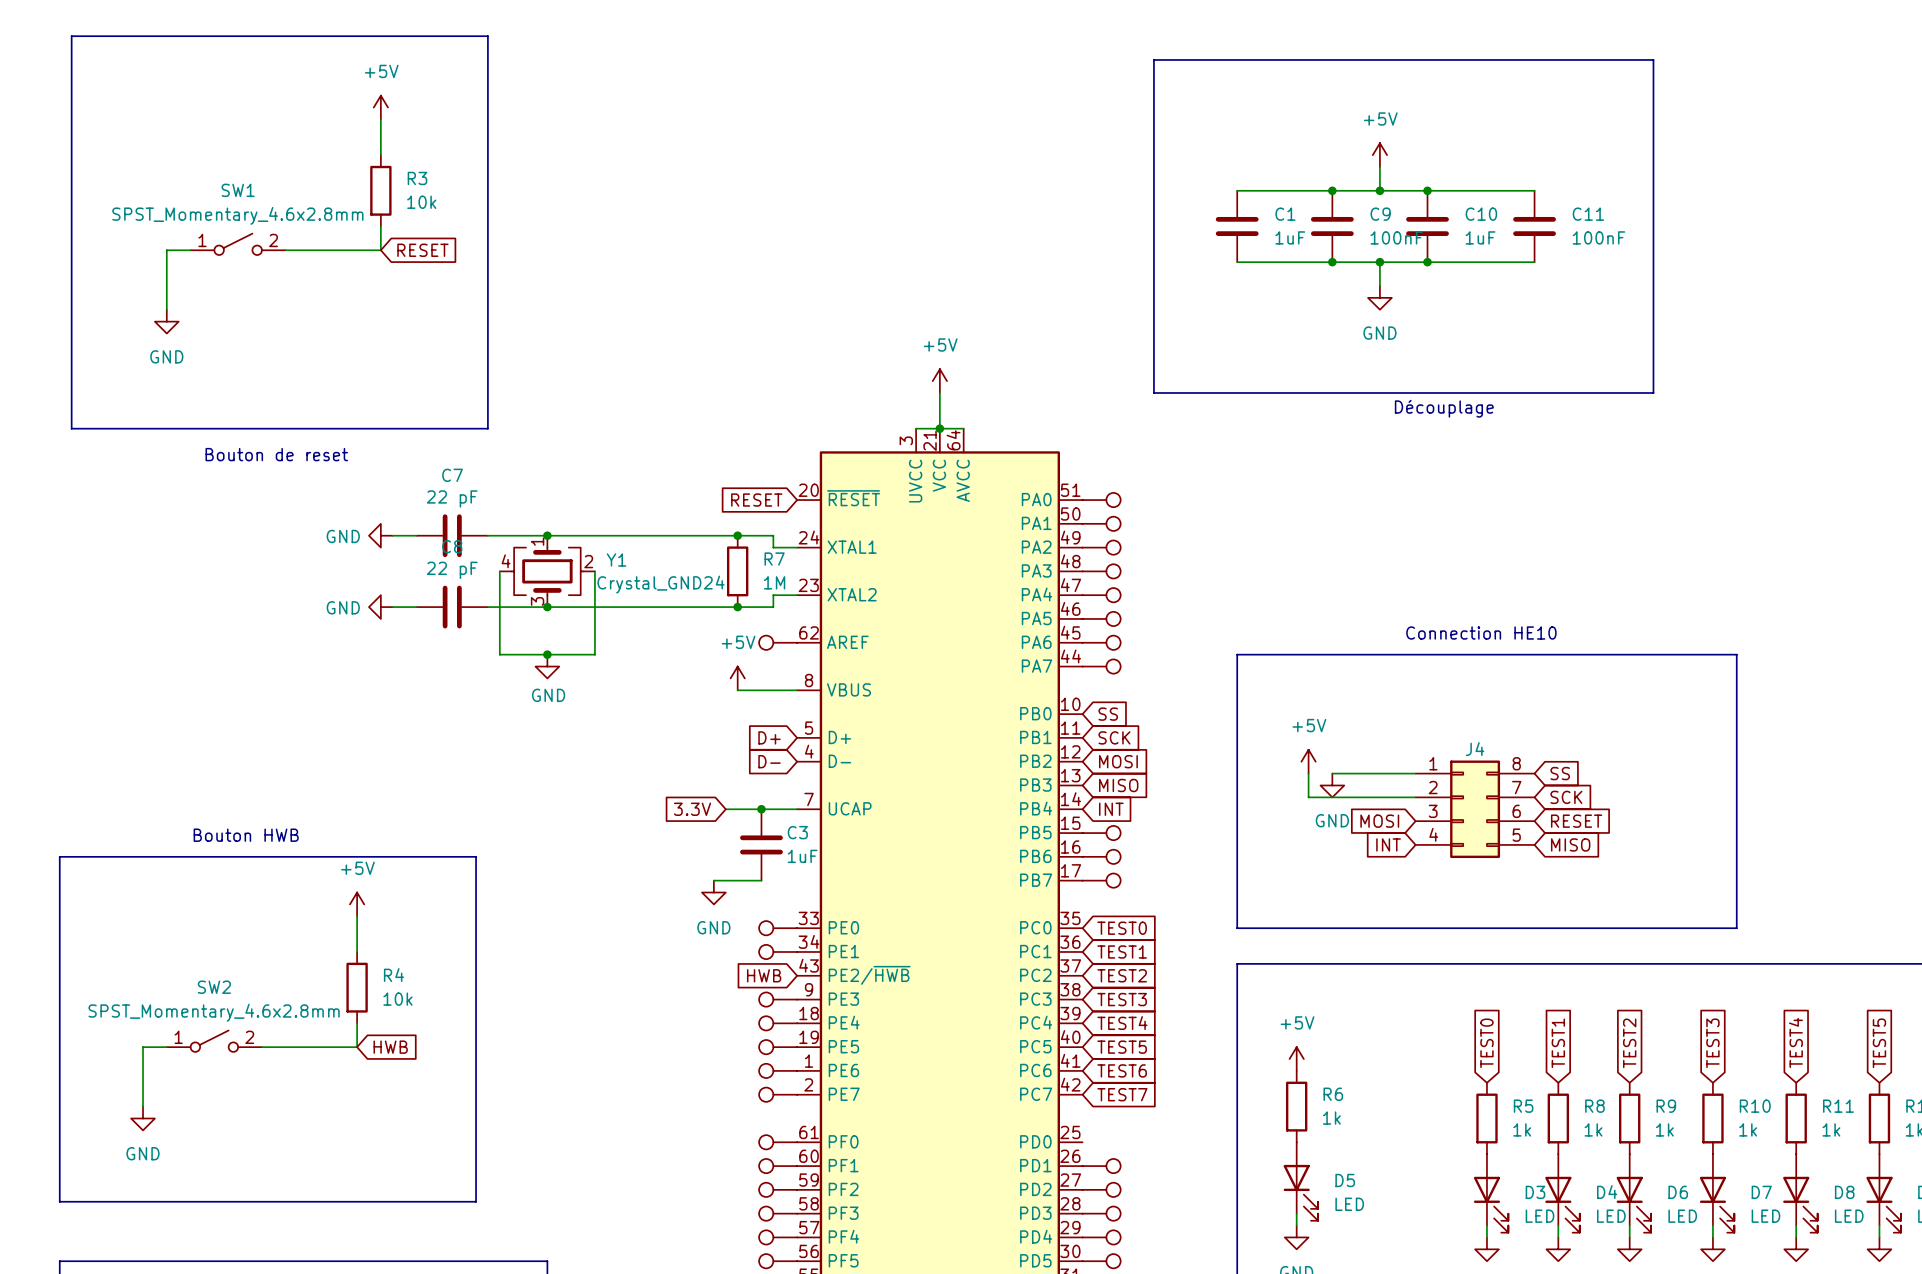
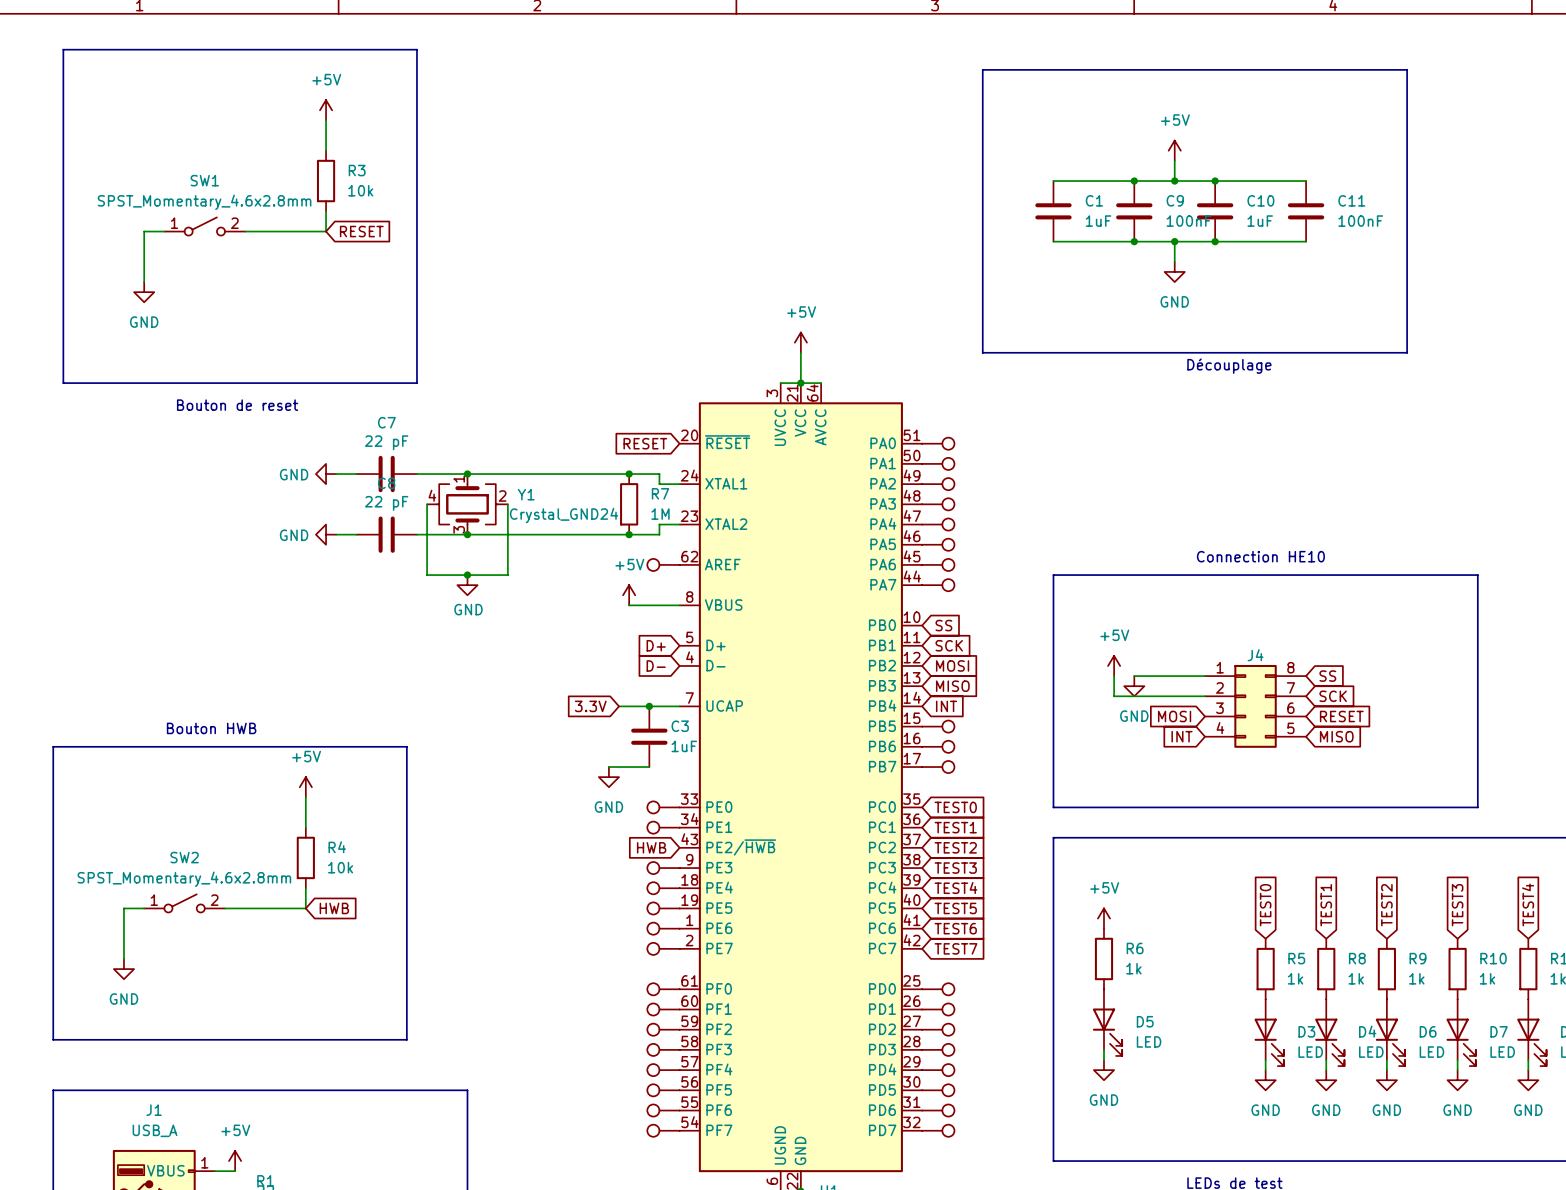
part: none -> (938, 989)

